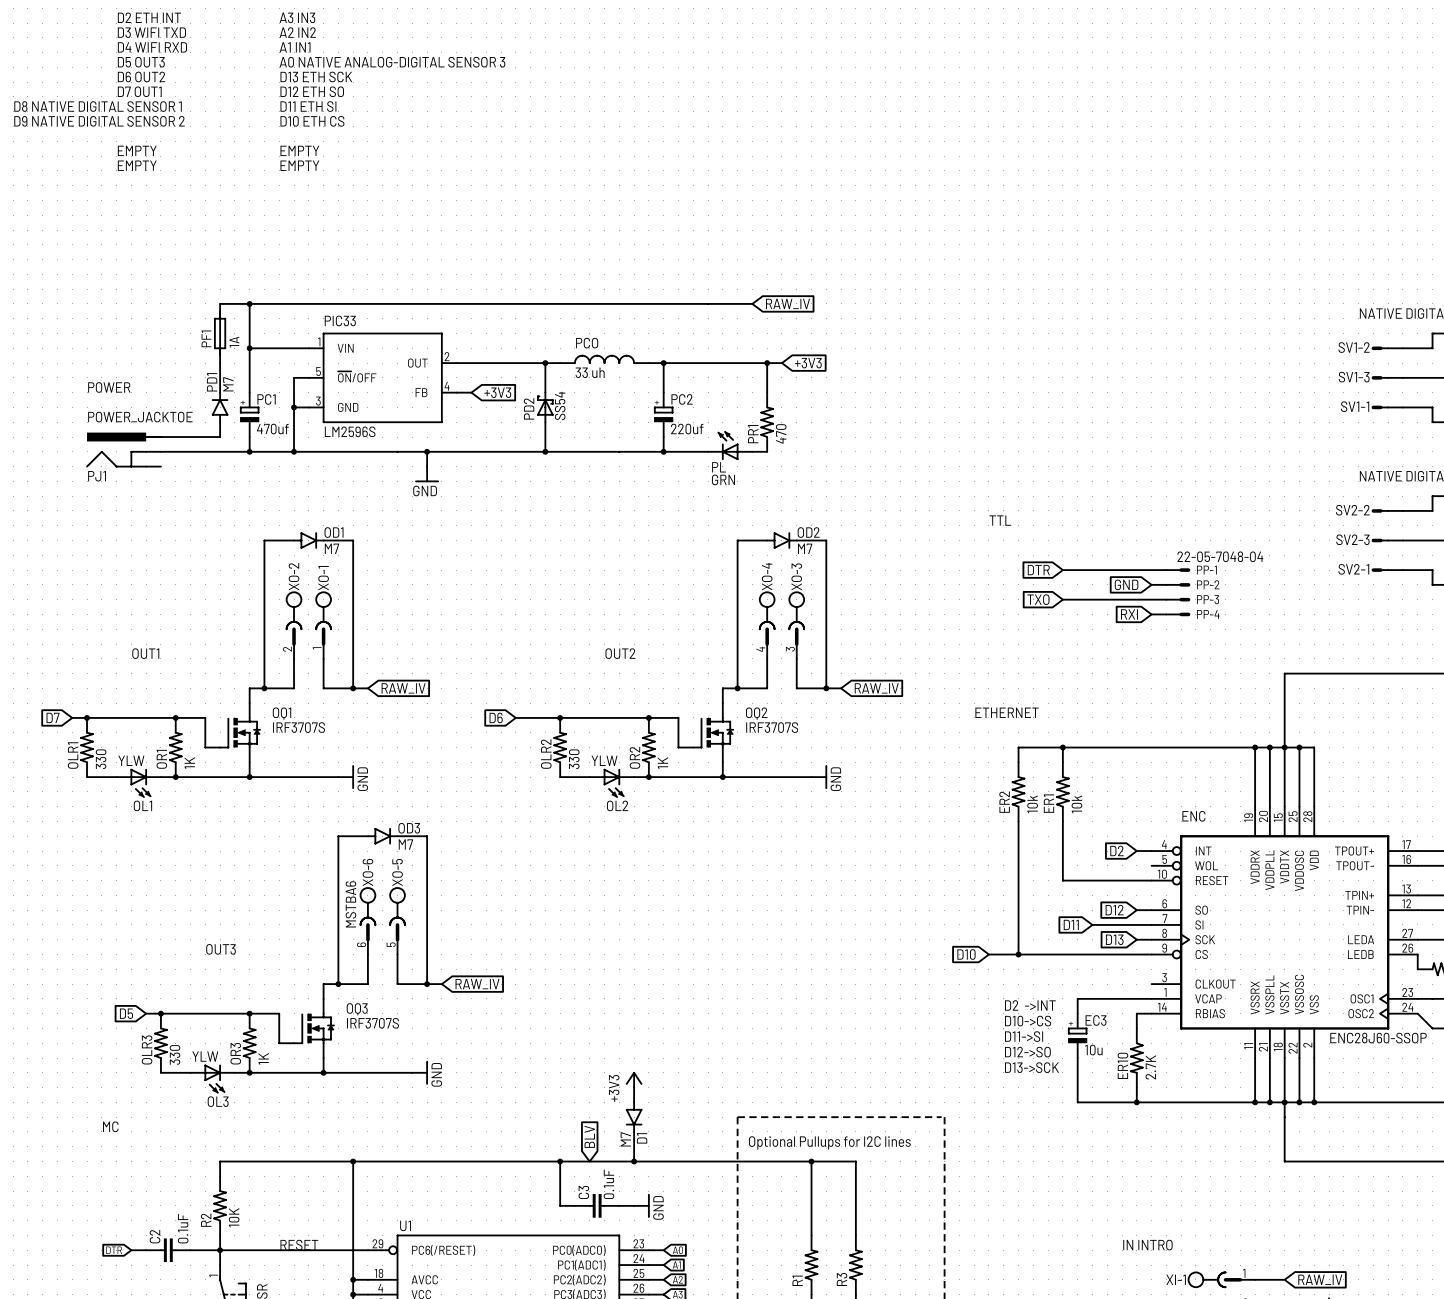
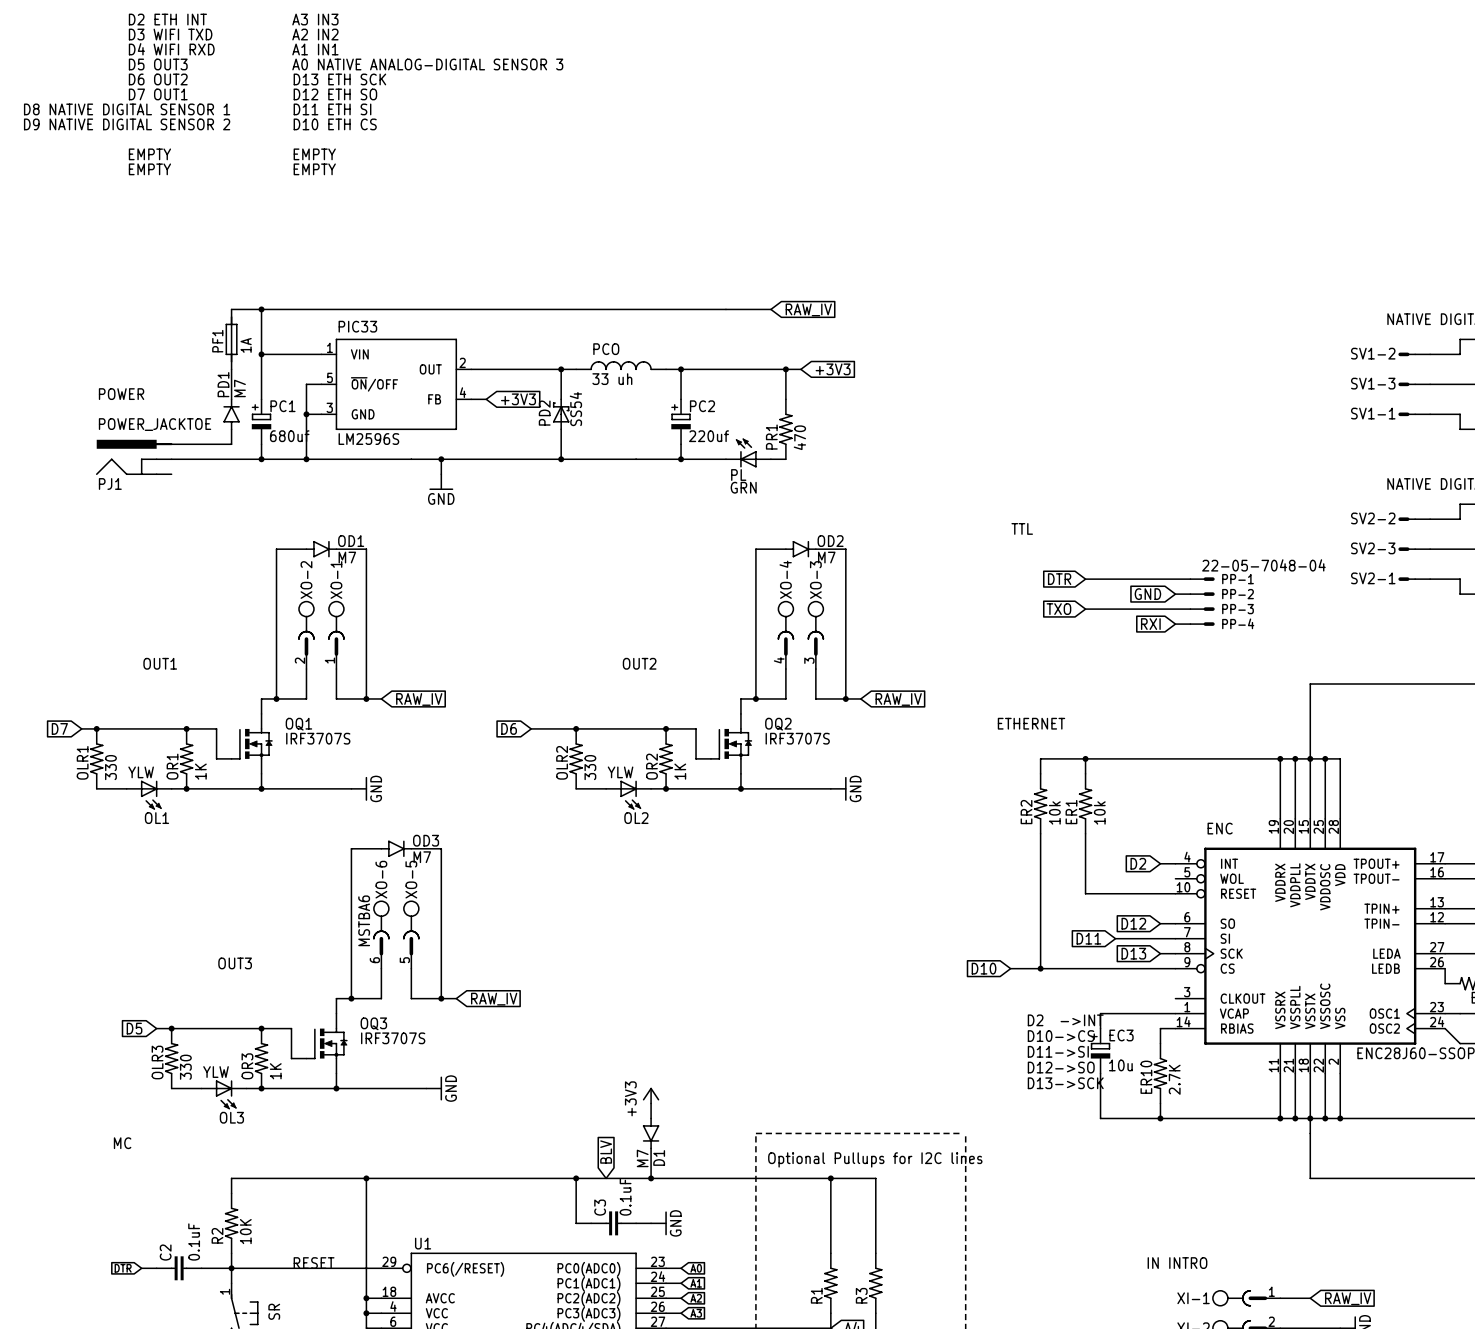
PC1 value: 470uf (272, 429) -> 680uf (289, 436)

